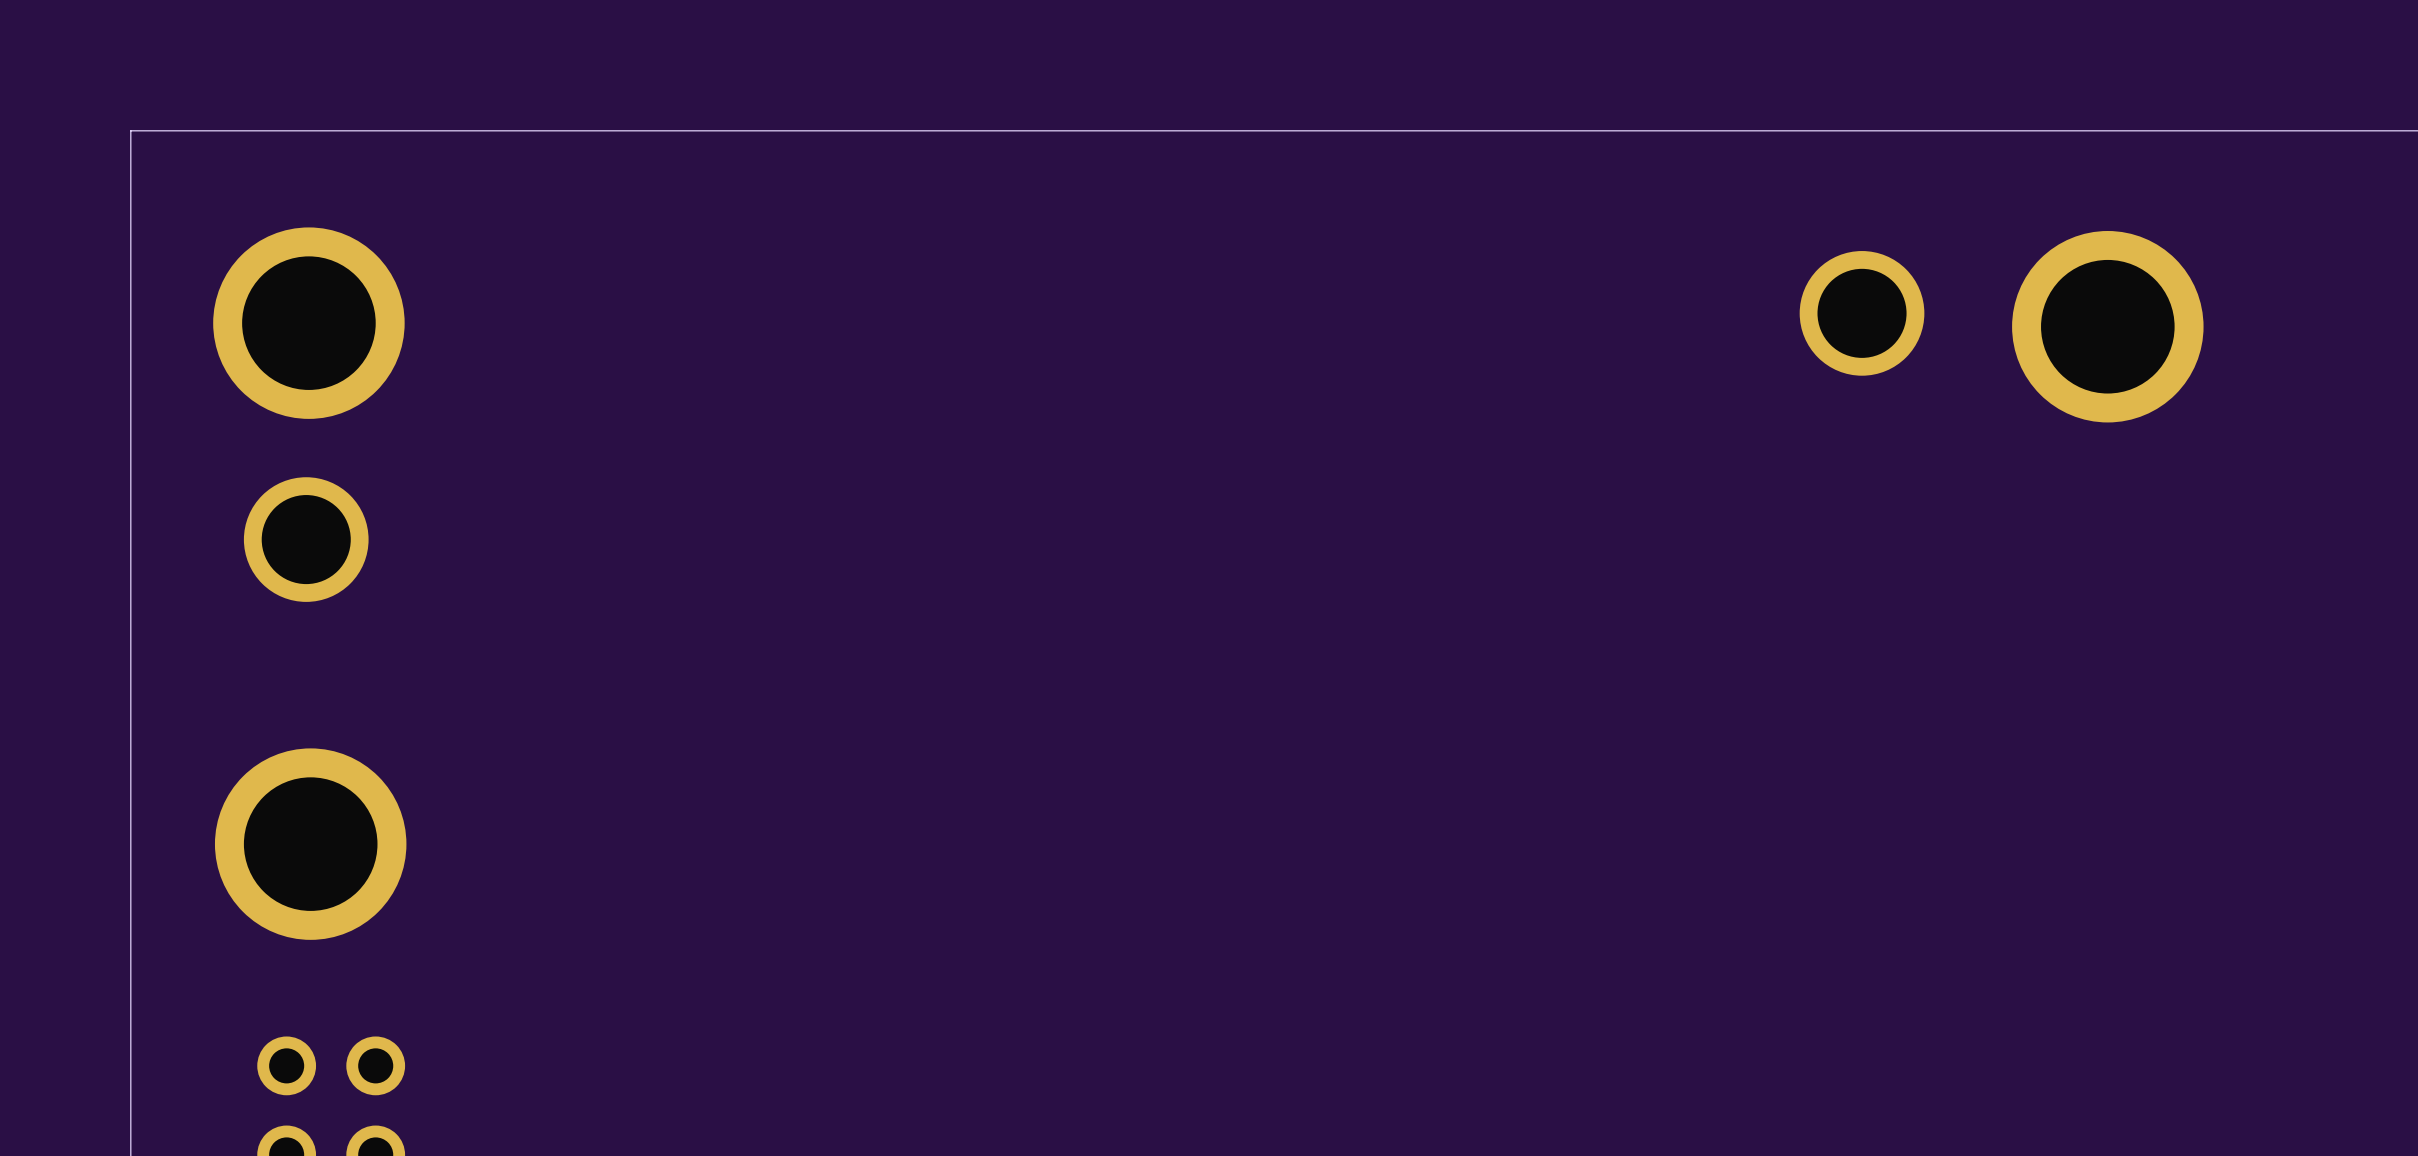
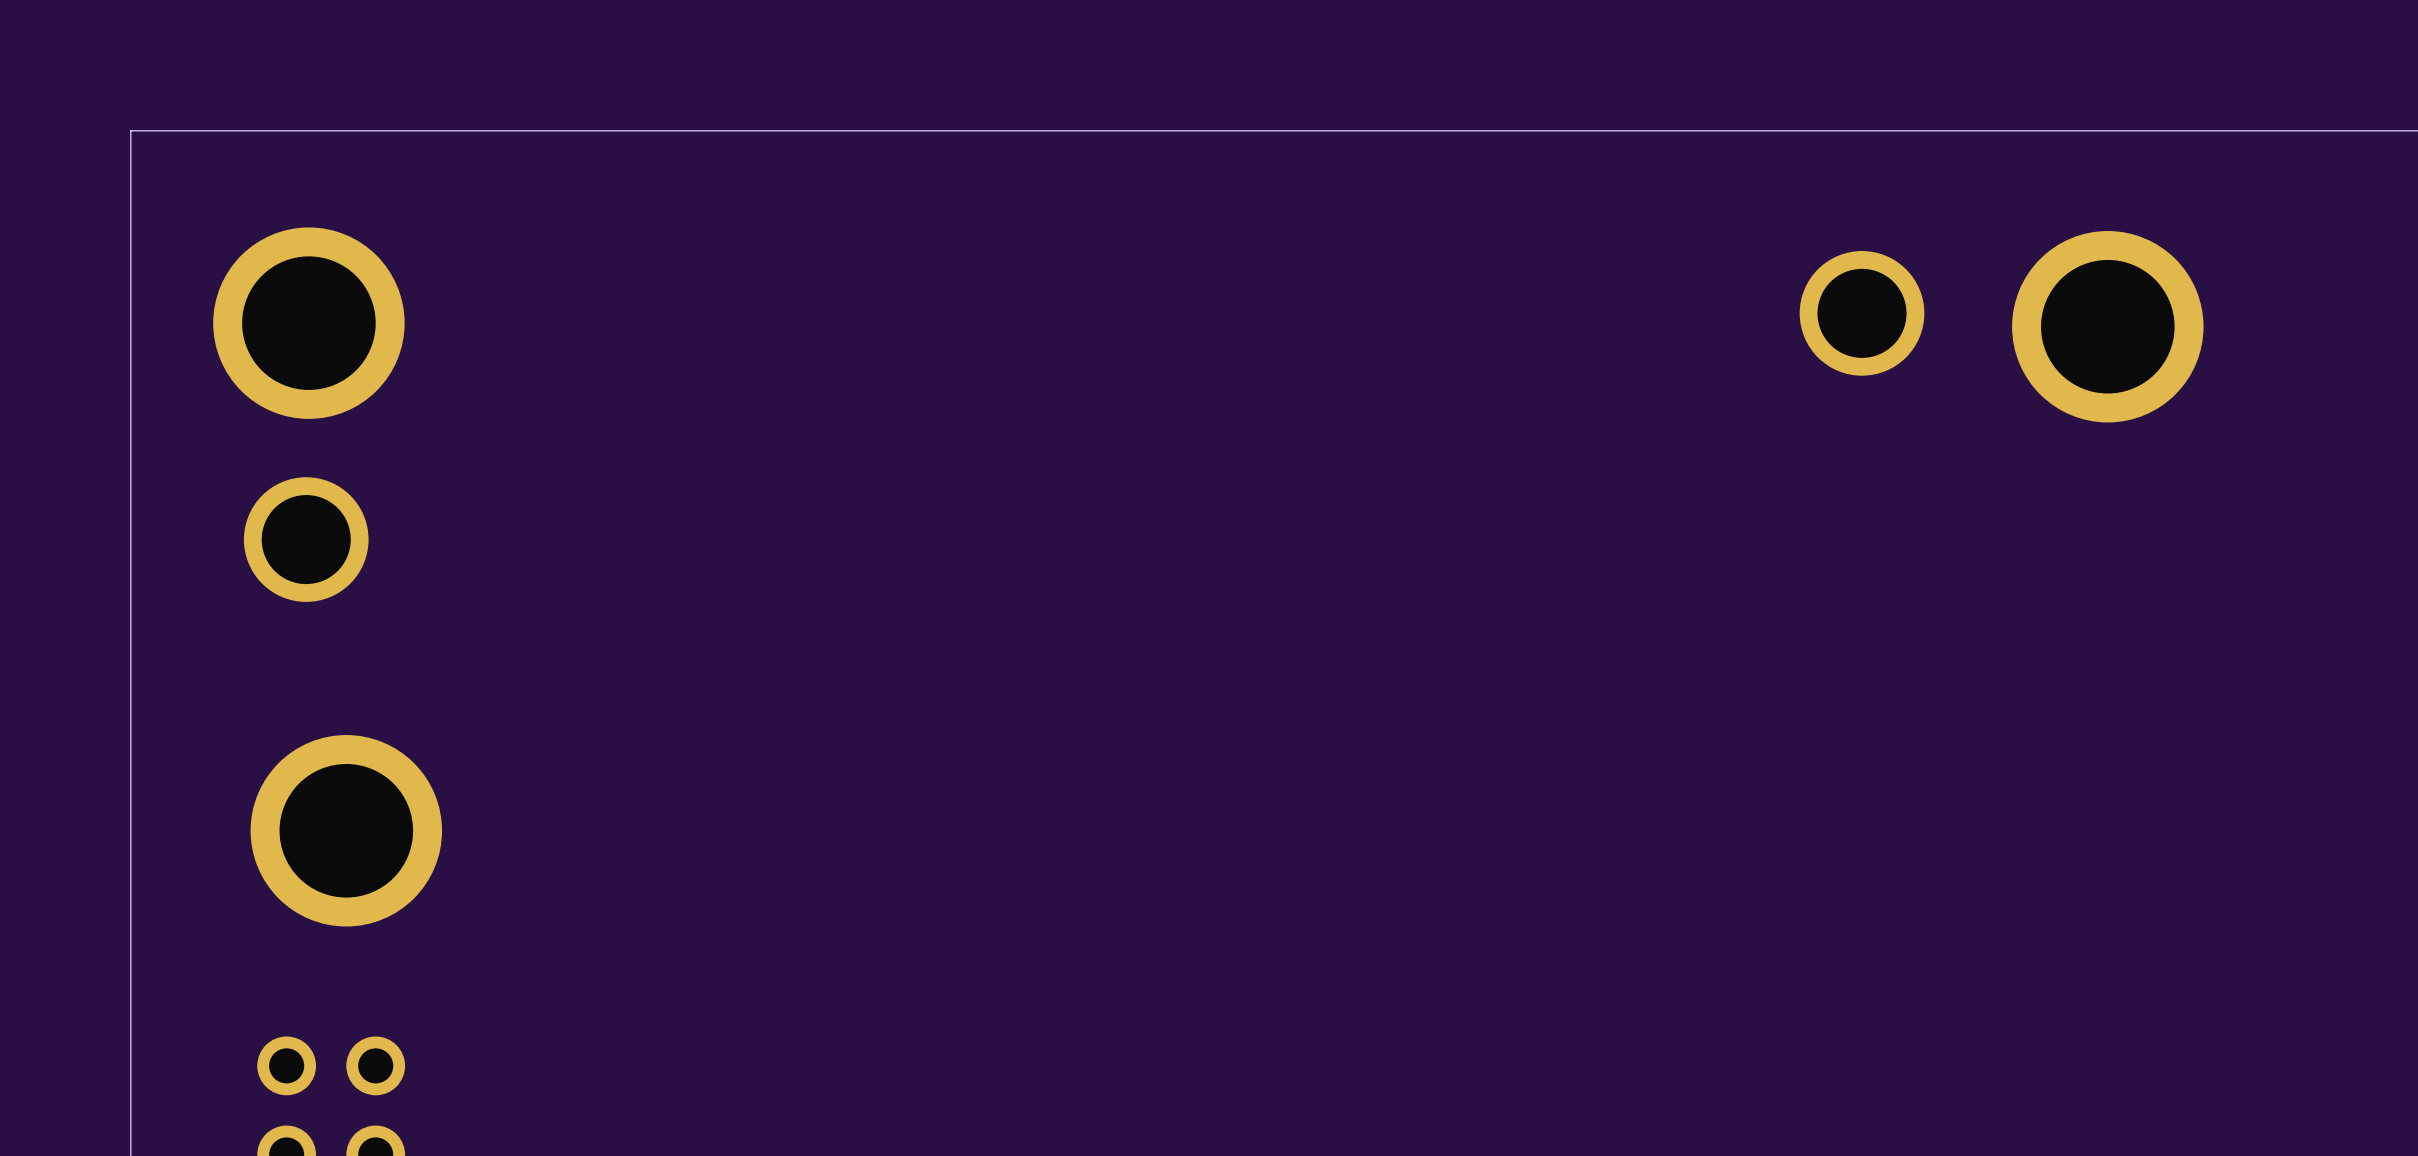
part position: (310, 844) -> (346, 830)

